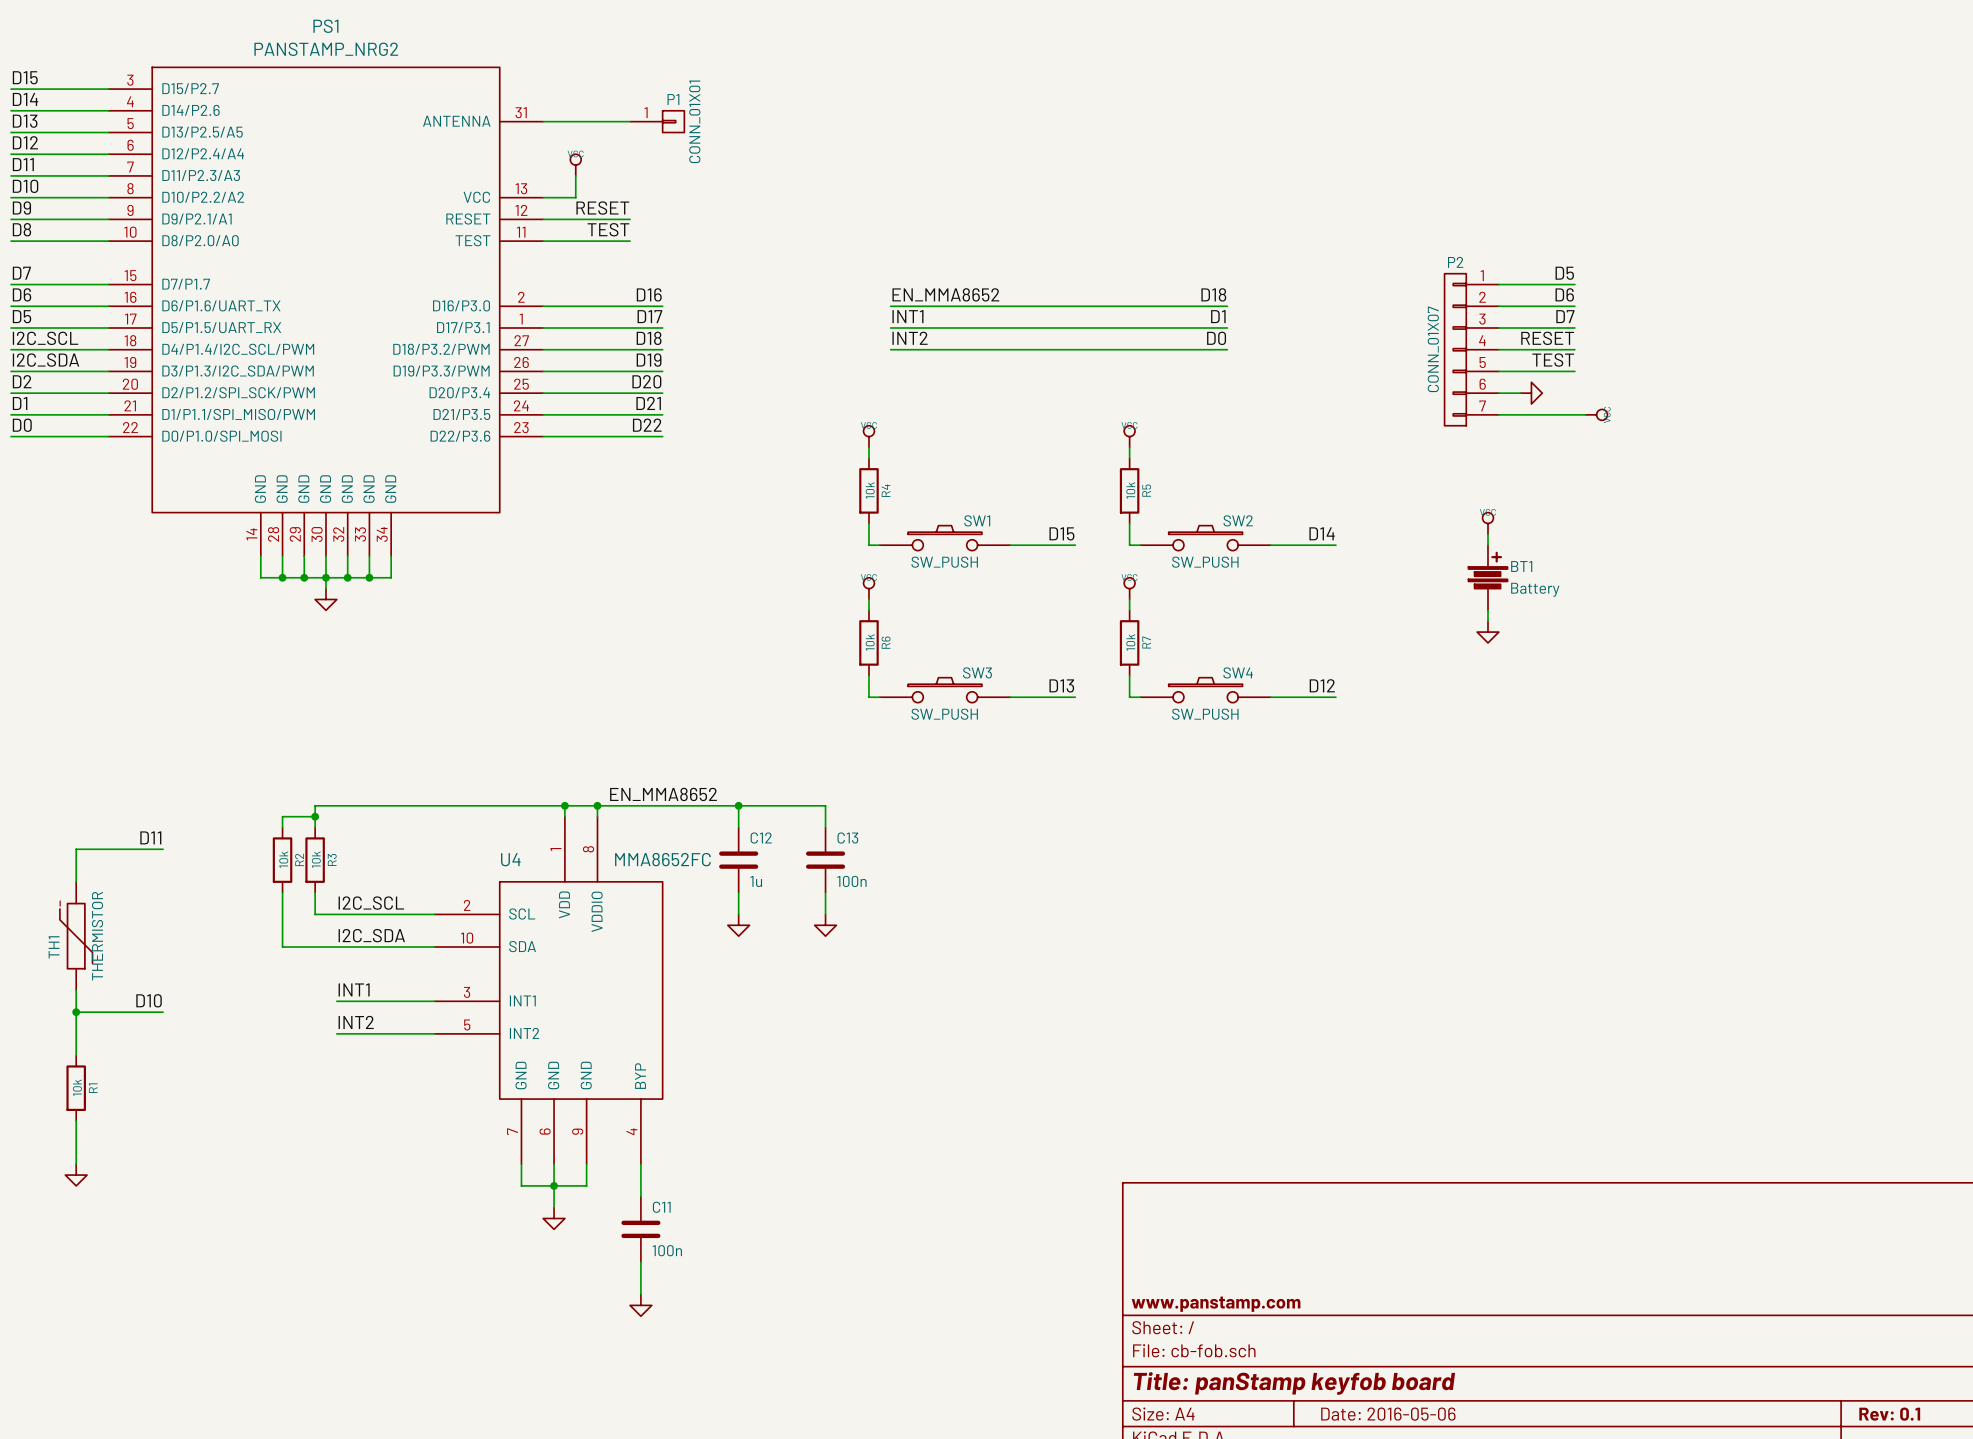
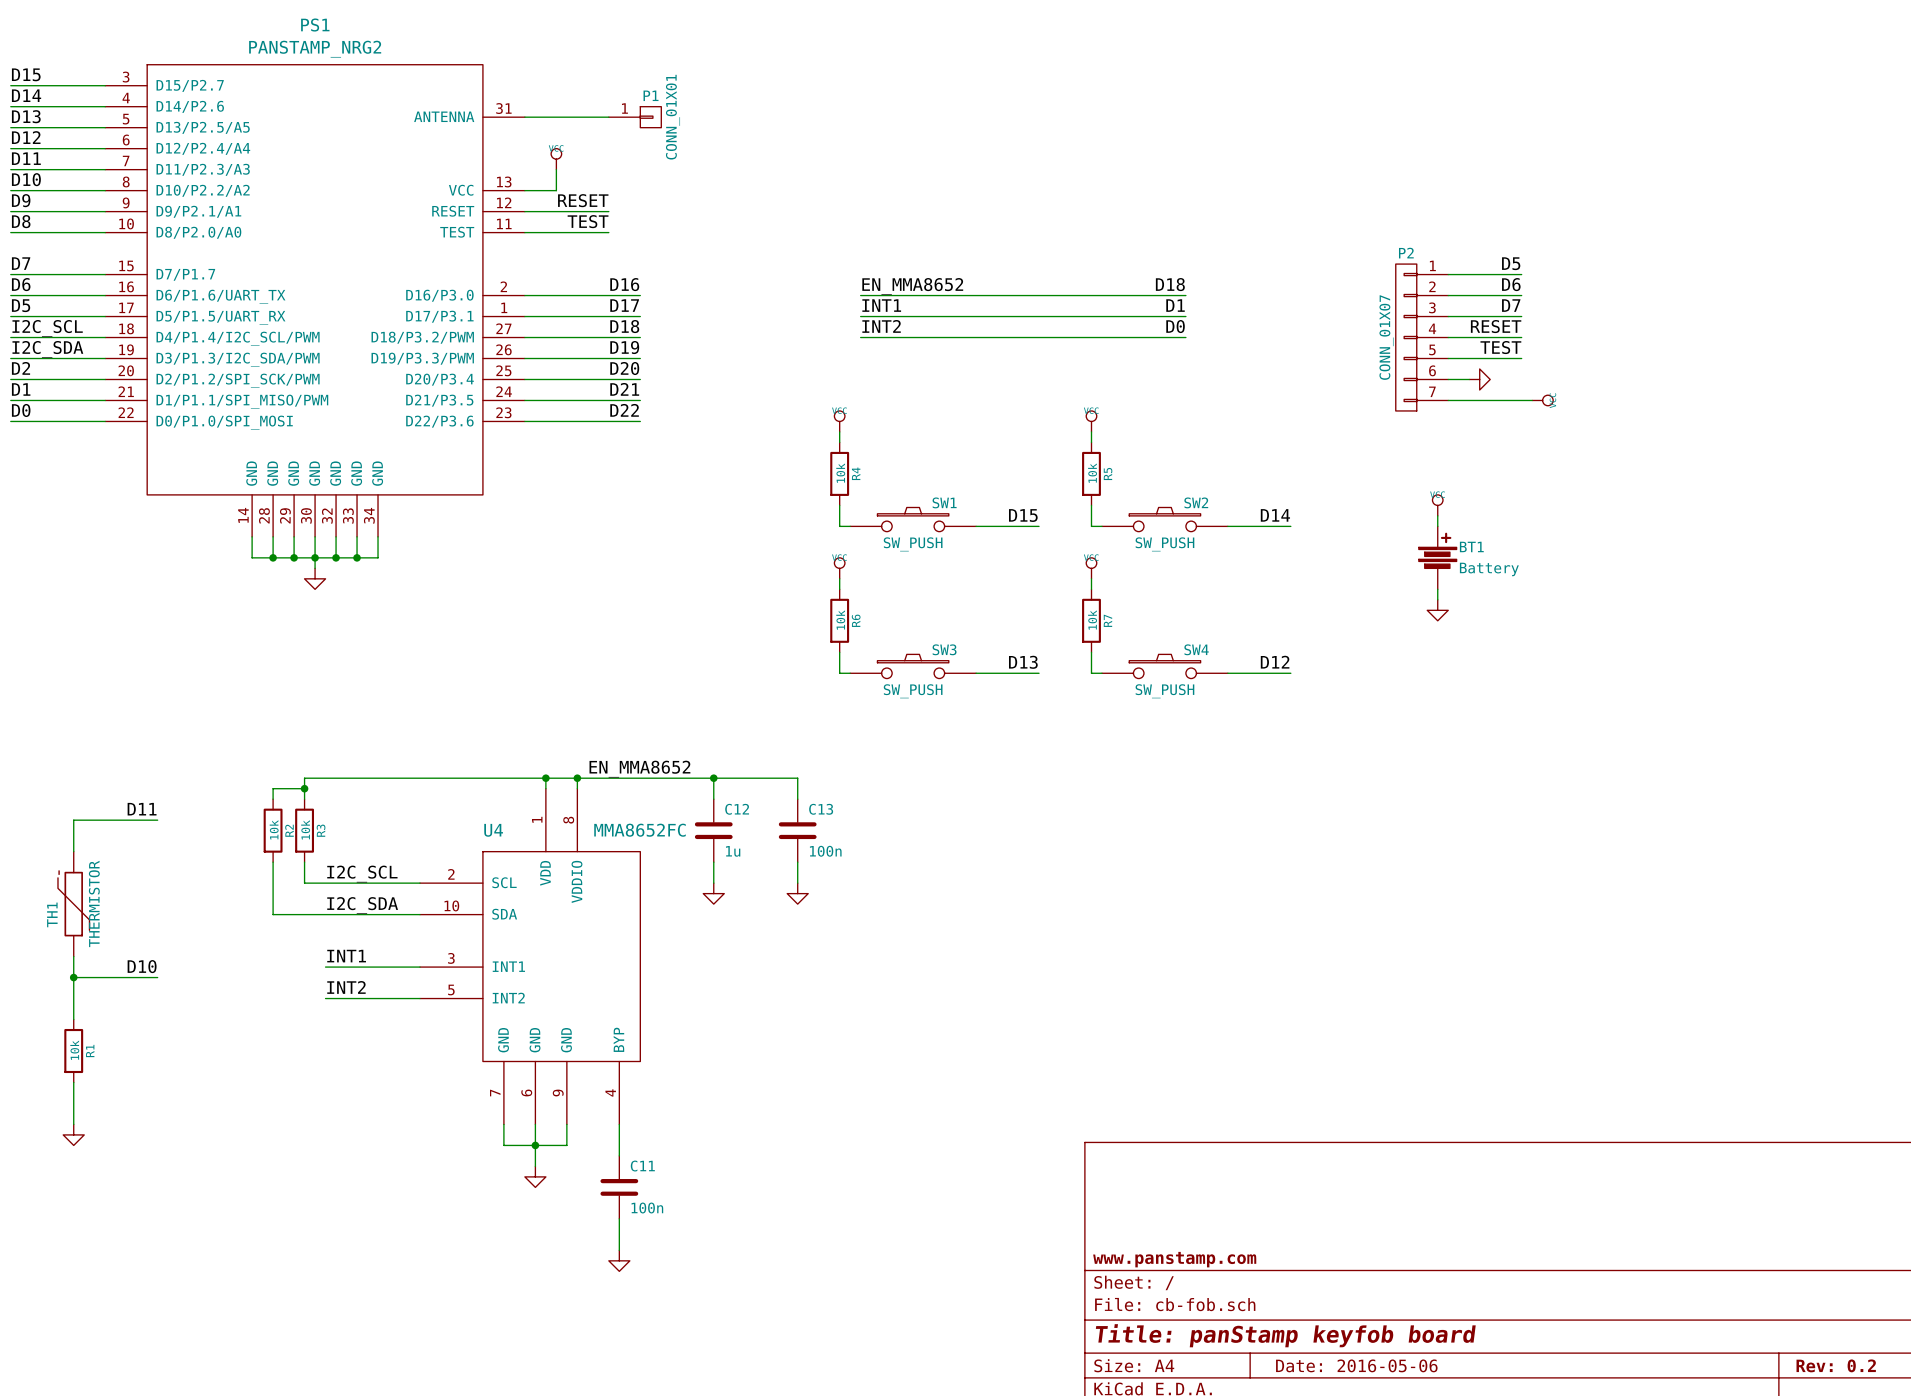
title block: Rev: 0.1 (1889, 1414) -> Rev: 0.2 (1836, 1365)

